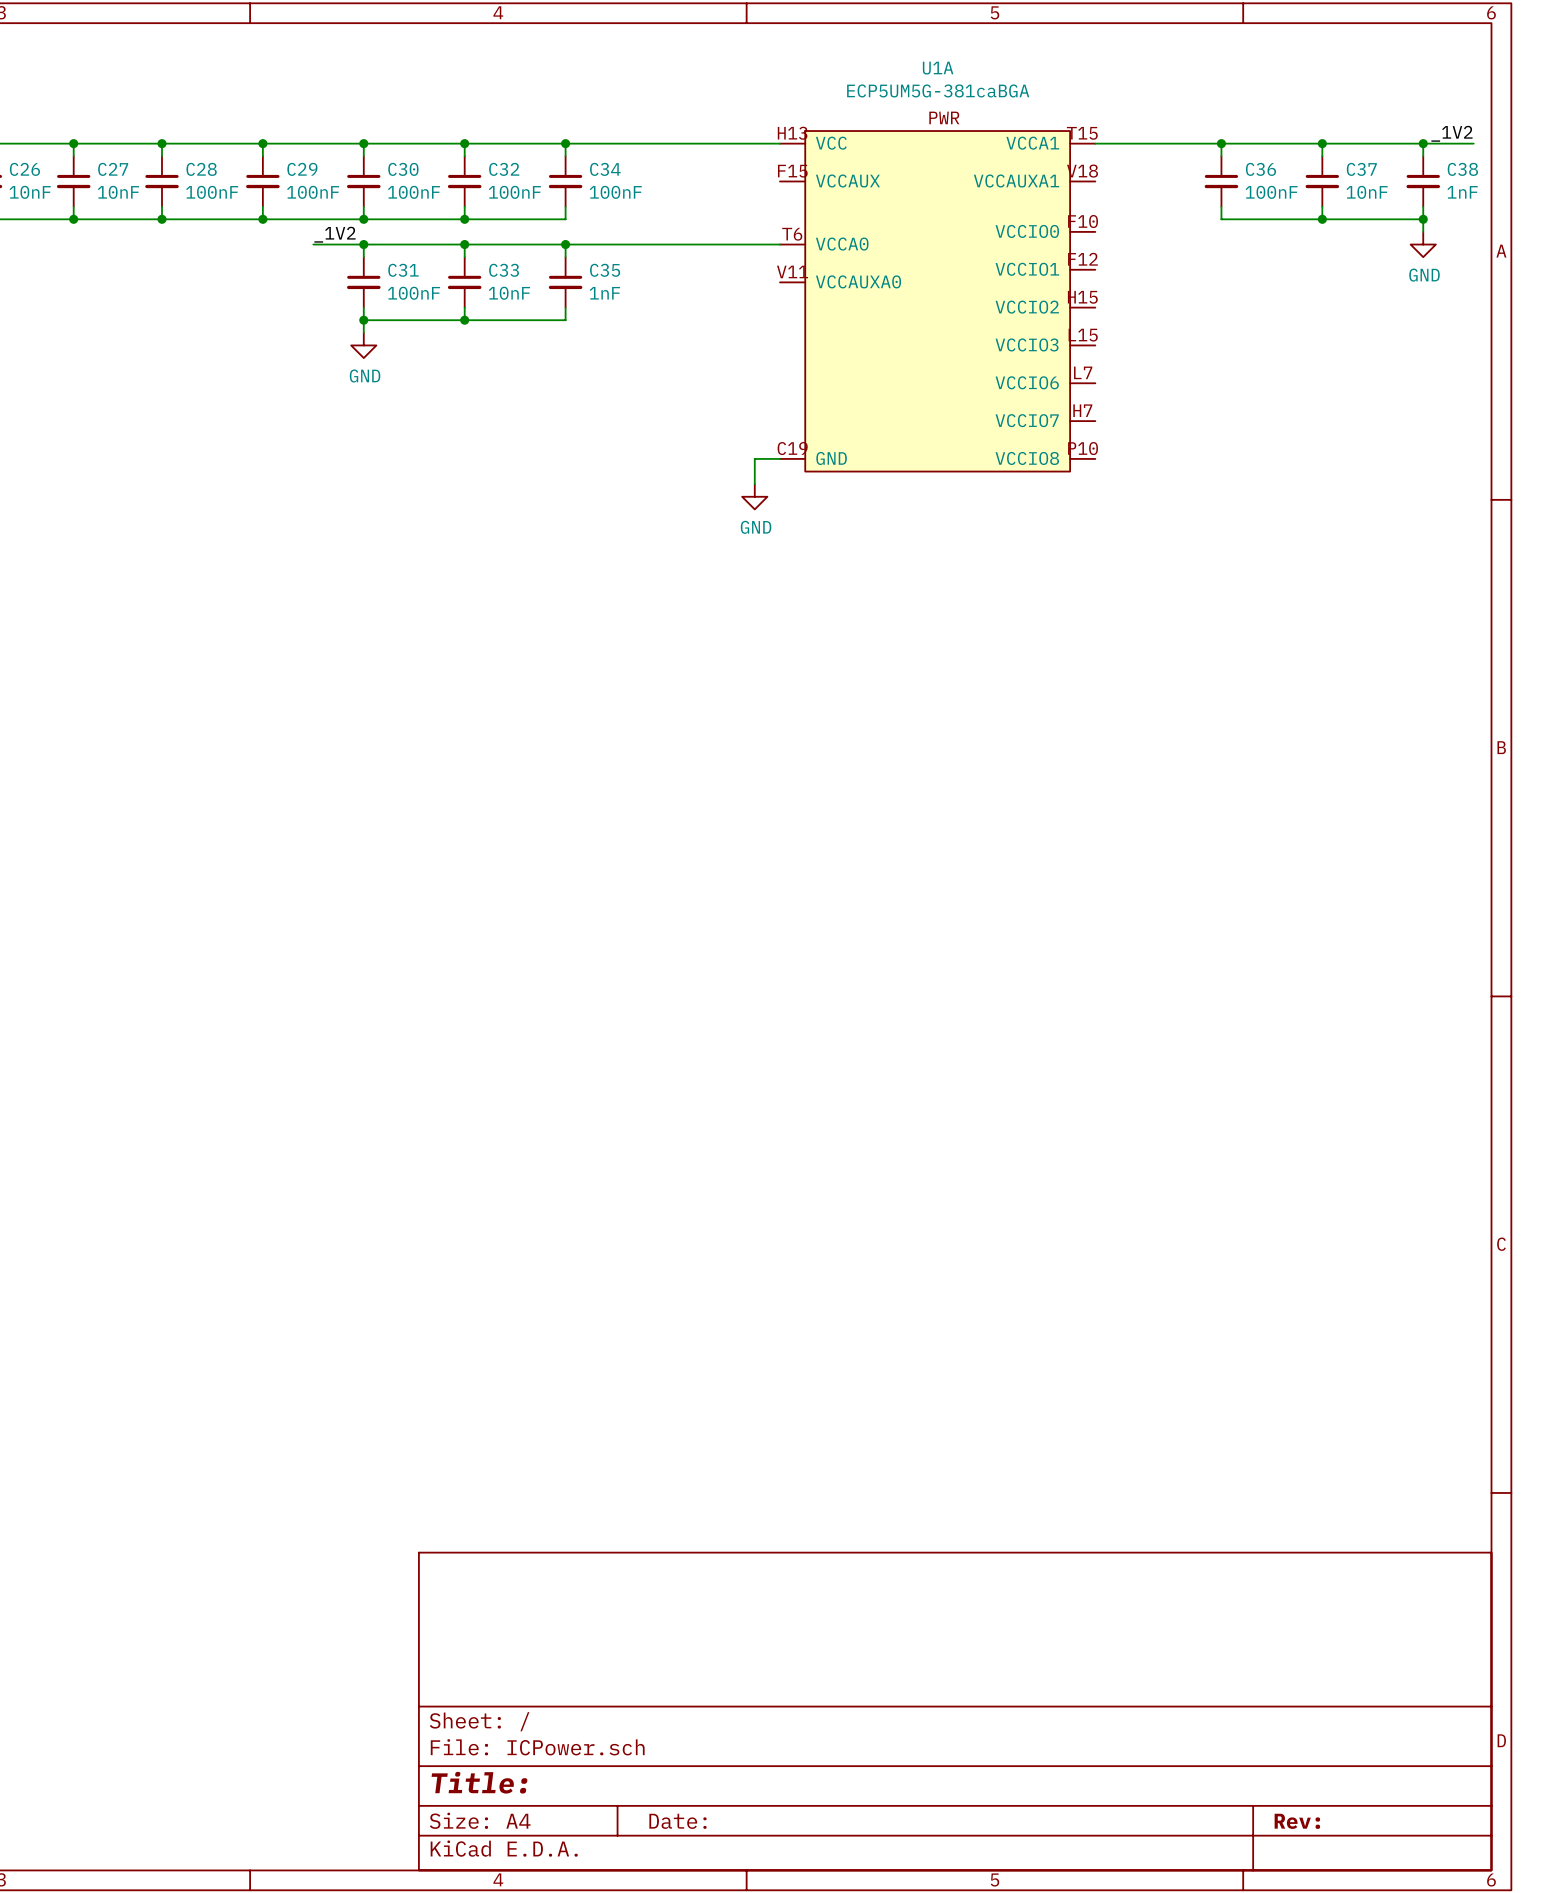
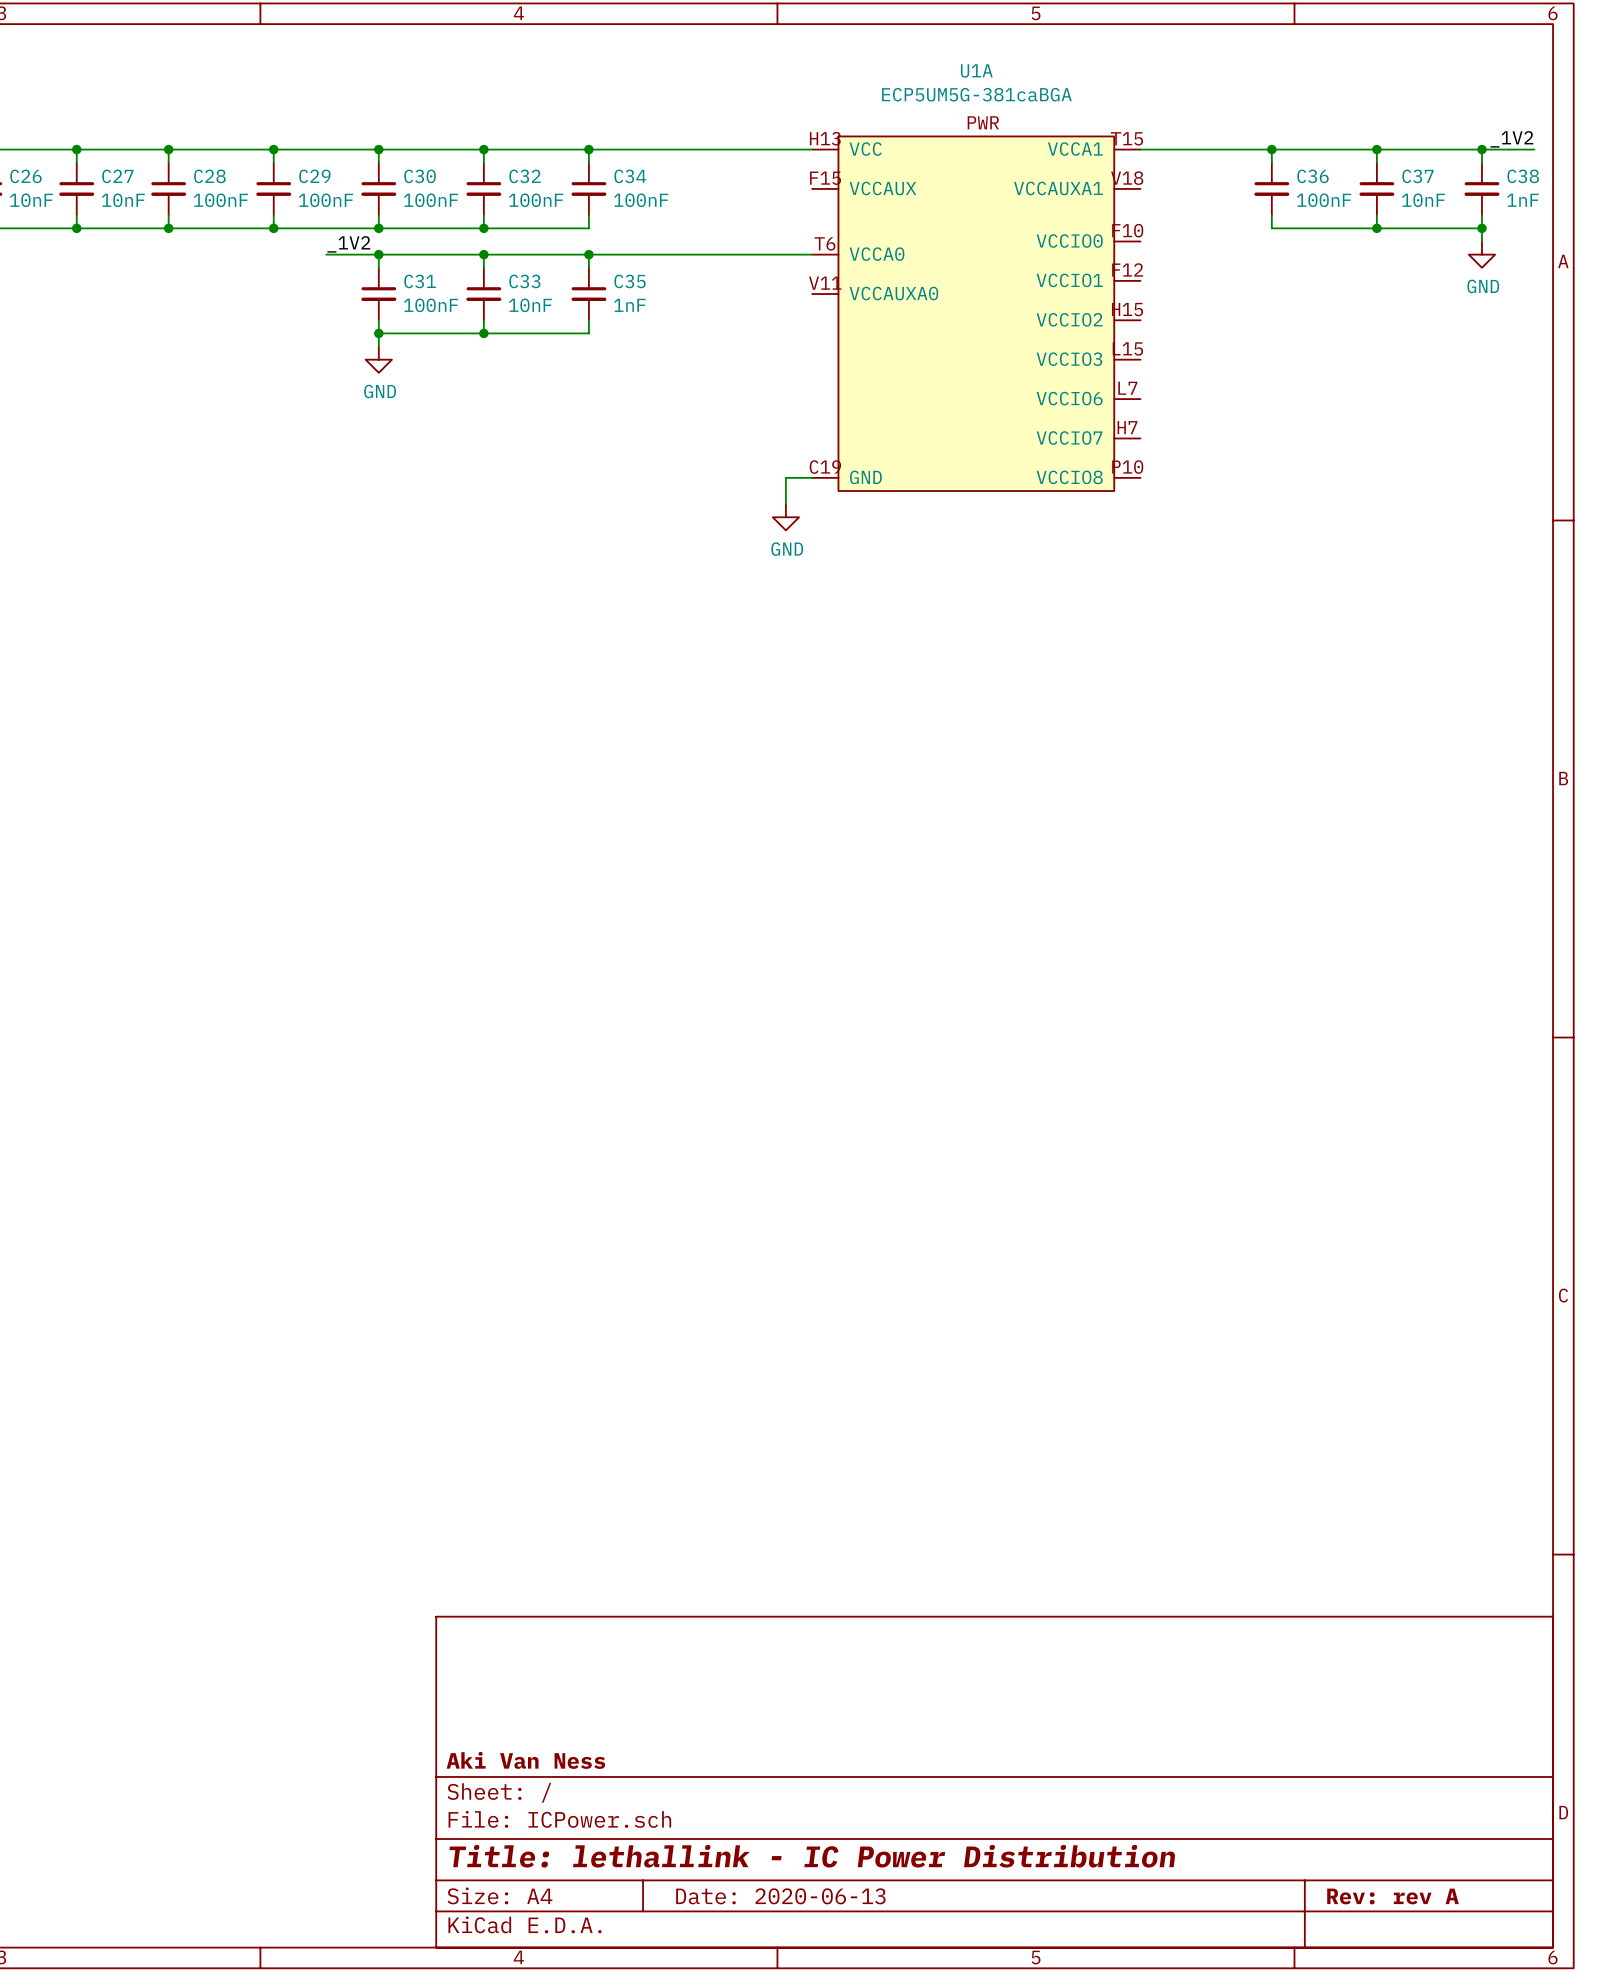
title block: none -> Aki Van Ness (525, 1760)
title block: Title: (479, 1782) -> Title: lethallink - IC Power Distribution (812, 1856)
title block: Date: (677, 1821) -> Date: 2020-06-13 (780, 1896)
title block: Rev: (1297, 1821) -> Rev: rev A (1392, 1896)

